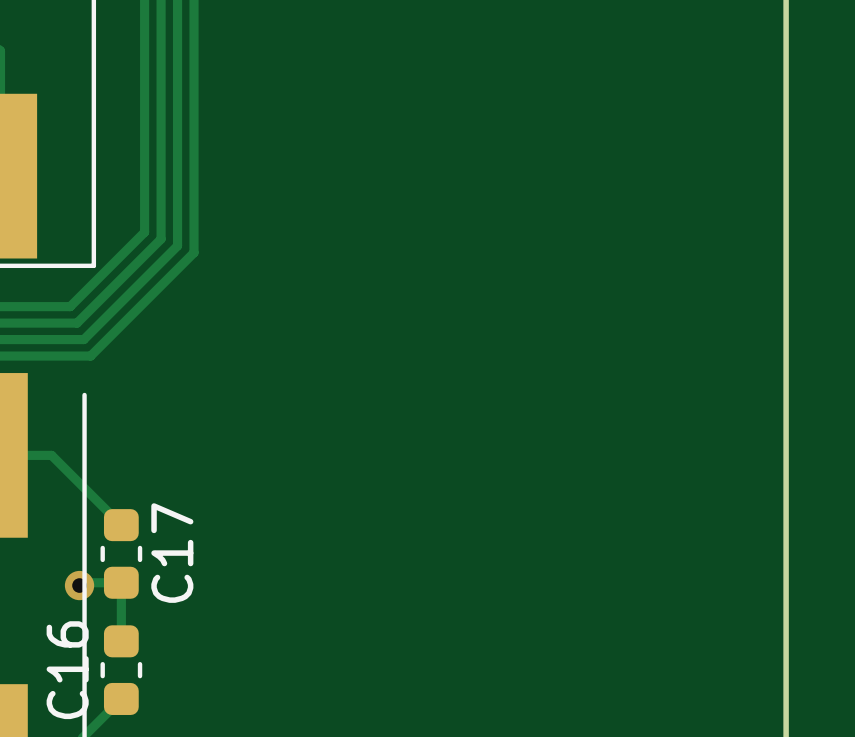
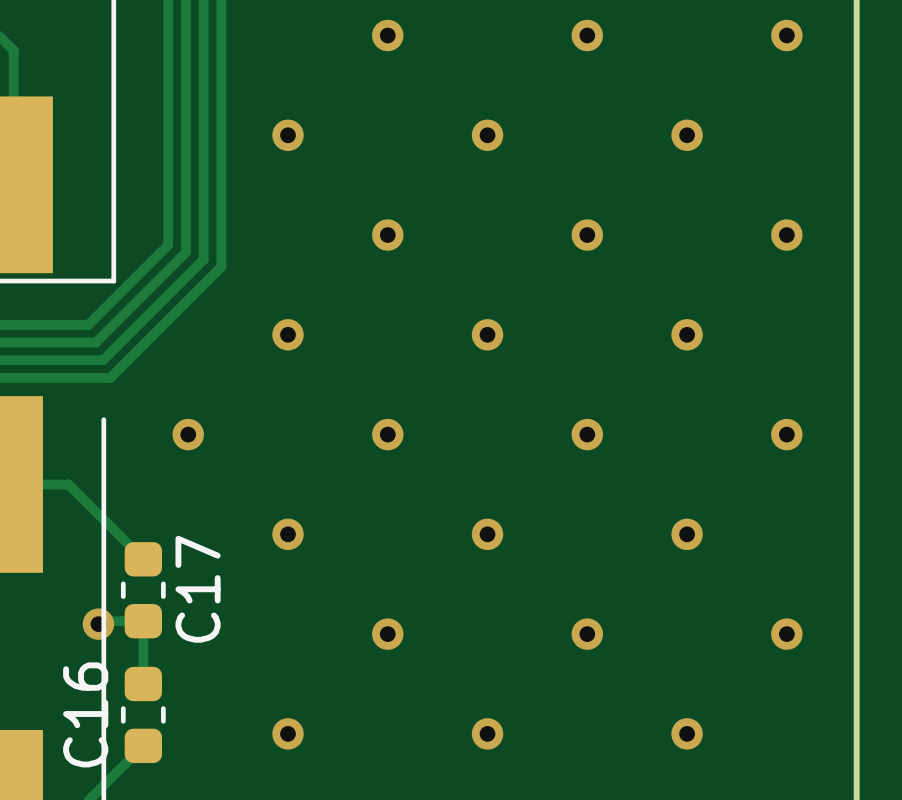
via: none -> (387, 35)
via: none -> (587, 35)
via: none -> (786, 35)
via: none -> (288, 135)
via: none -> (487, 135)
via: none -> (687, 135)
via: none -> (387, 235)
via: none -> (587, 235)
via: none -> (786, 235)
via: none -> (288, 334)
via: none -> (487, 334)
via: none -> (687, 334)
via: none -> (188, 434)
via: none -> (387, 434)
via: none -> (587, 434)
via: none -> (786, 434)
via: none -> (288, 534)
via: none -> (487, 534)
via: none -> (687, 534)
via: none -> (387, 634)
via: none -> (587, 634)
via: none -> (786, 634)
via: none -> (288, 733)
via: none -> (487, 733)
via: none -> (687, 733)

